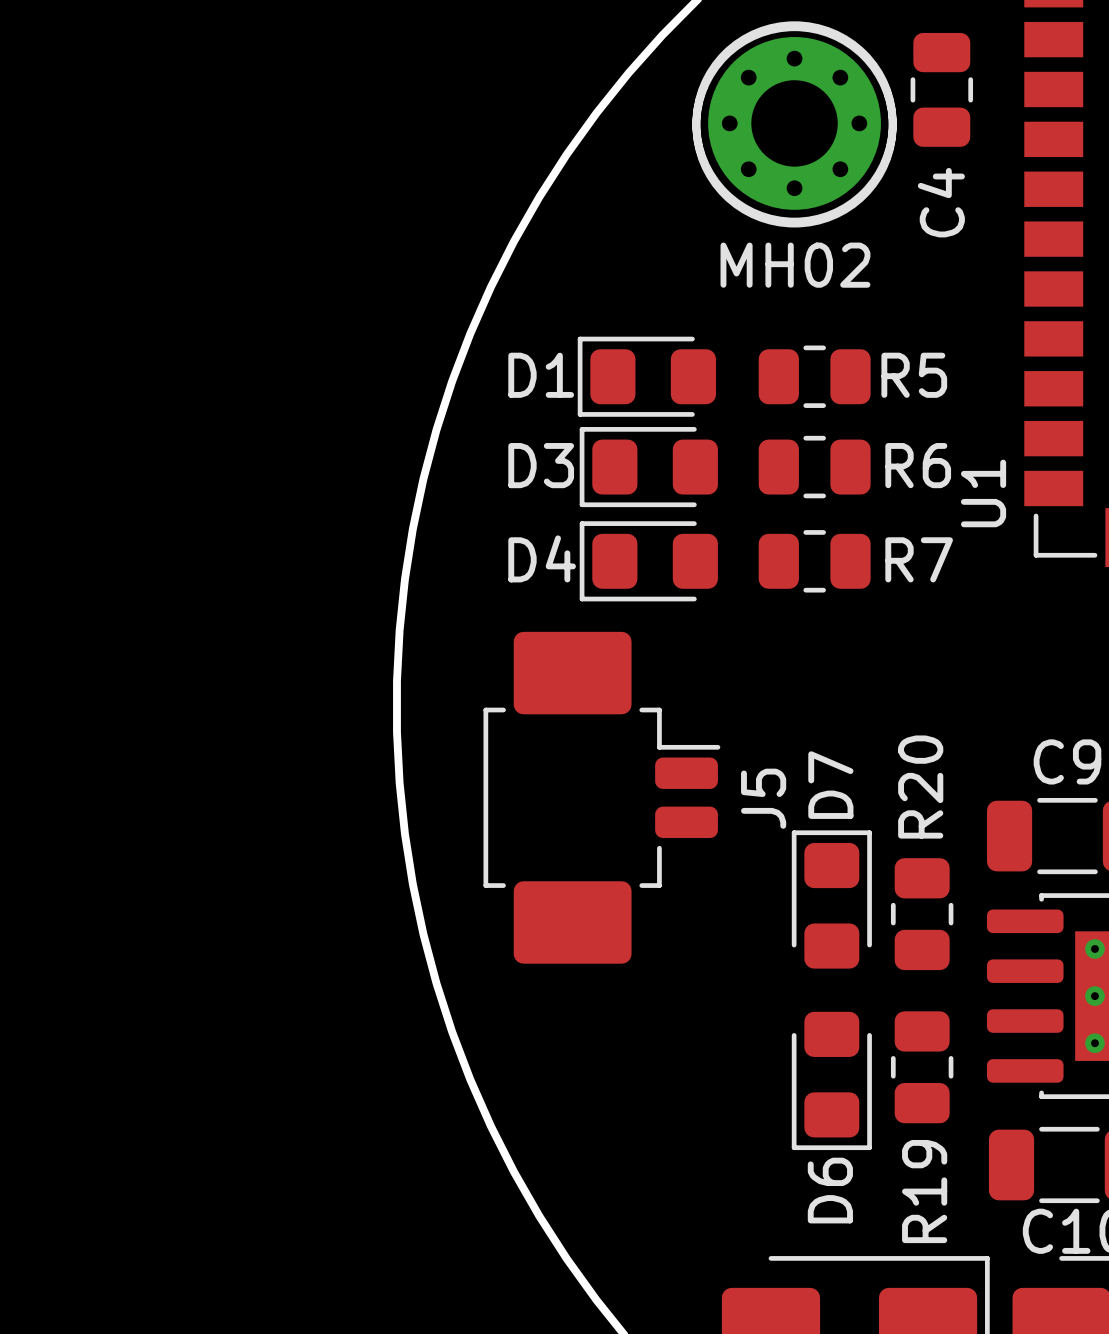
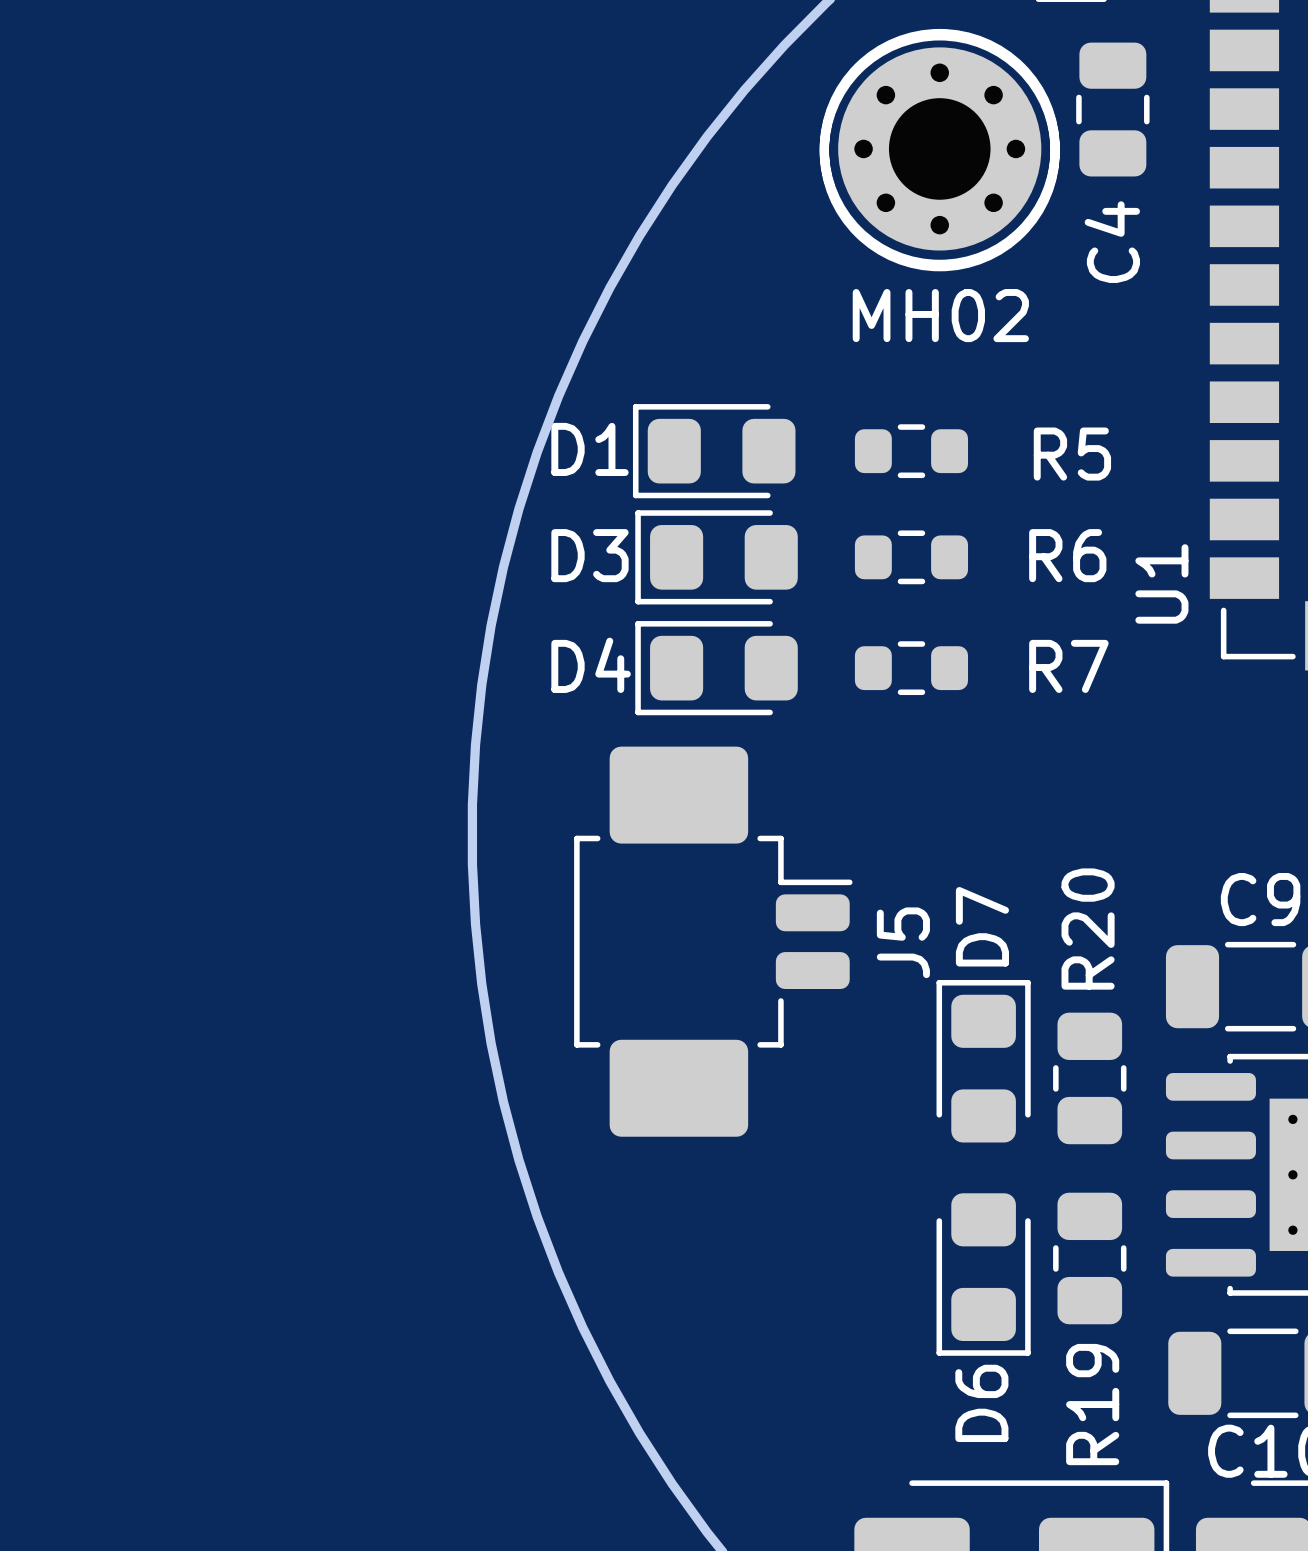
R5 footprint: [758, 345, 871, 408] -> [854, 424, 969, 479]
D1 position: (646, 376) -> (714, 451)
R6 footprint: [758, 435, 871, 499] -> [854, 530, 969, 585]
D3 position: (648, 467) -> (716, 557)
R7 footprint: [758, 530, 871, 593] -> [854, 641, 969, 696]
D4 position: (648, 561) -> (716, 668)

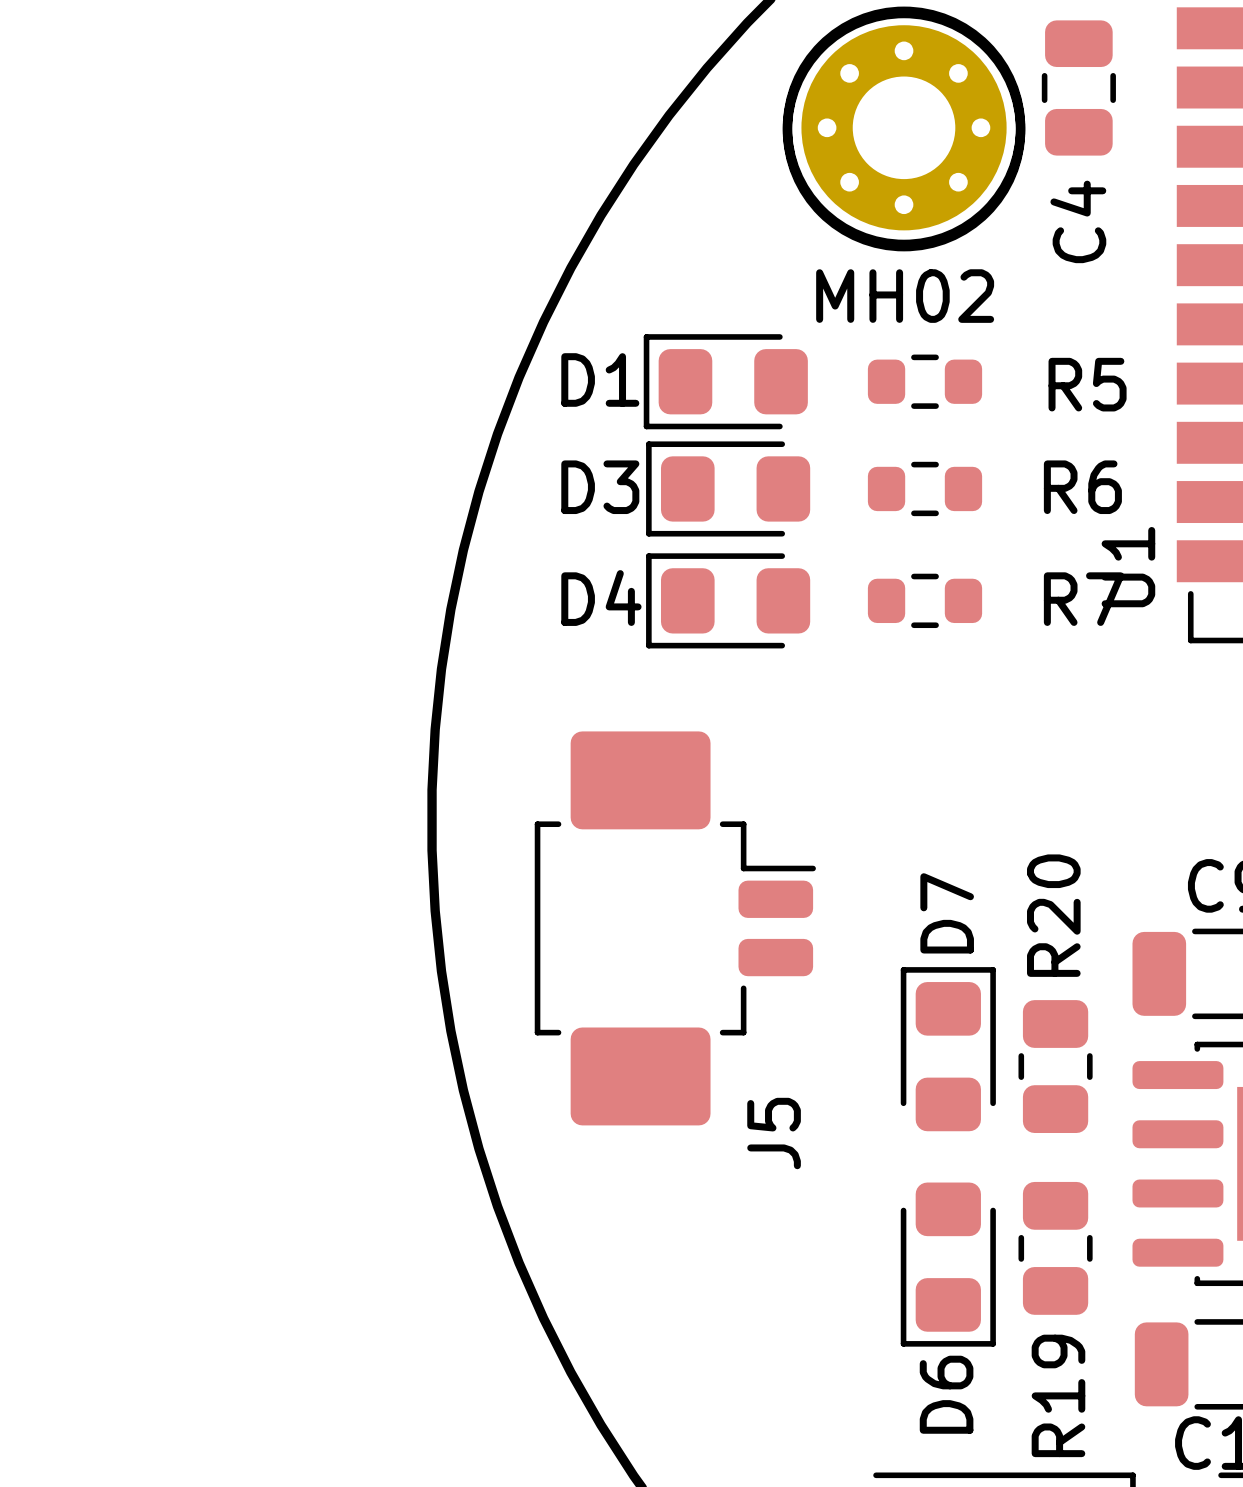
D1 position: (714, 451) -> (725, 381)
R5 position: (911, 451) -> (925, 381)
D3 position: (716, 557) -> (728, 488)
R6 position: (911, 557) -> (925, 488)
D4 position: (716, 668) -> (728, 600)
R7 position: (911, 668) -> (925, 600)
J5 name position: J5 (903, 942) -> J5 (774, 1133)

